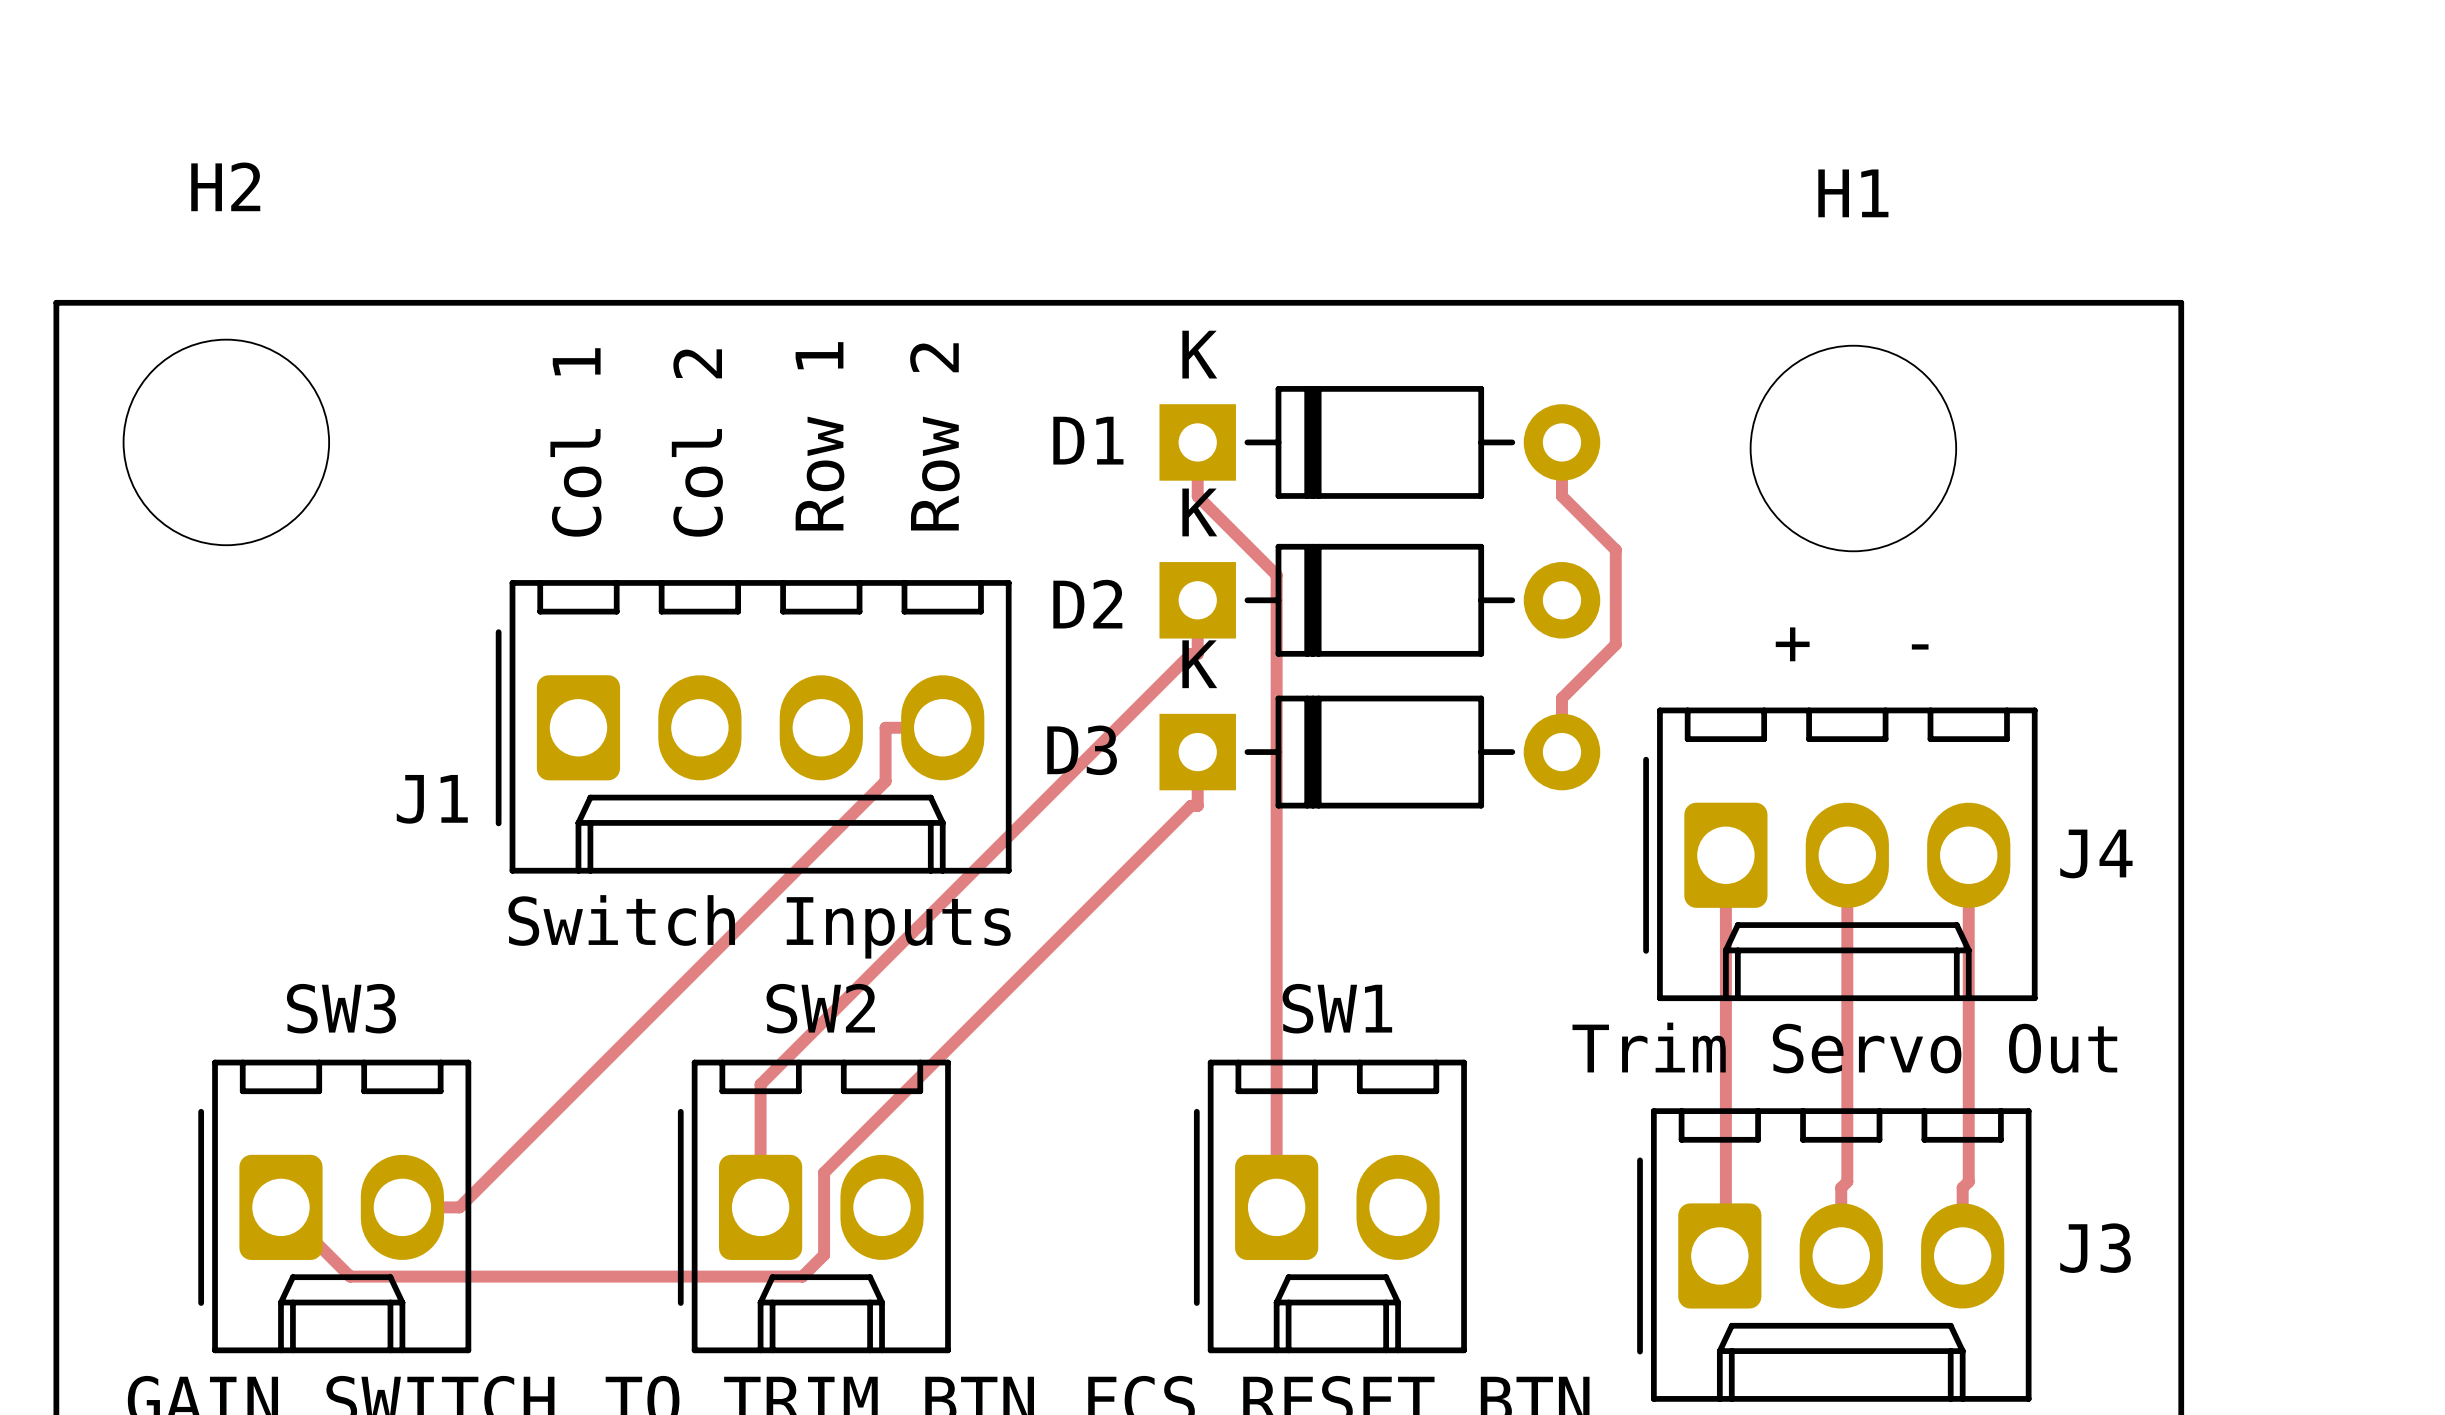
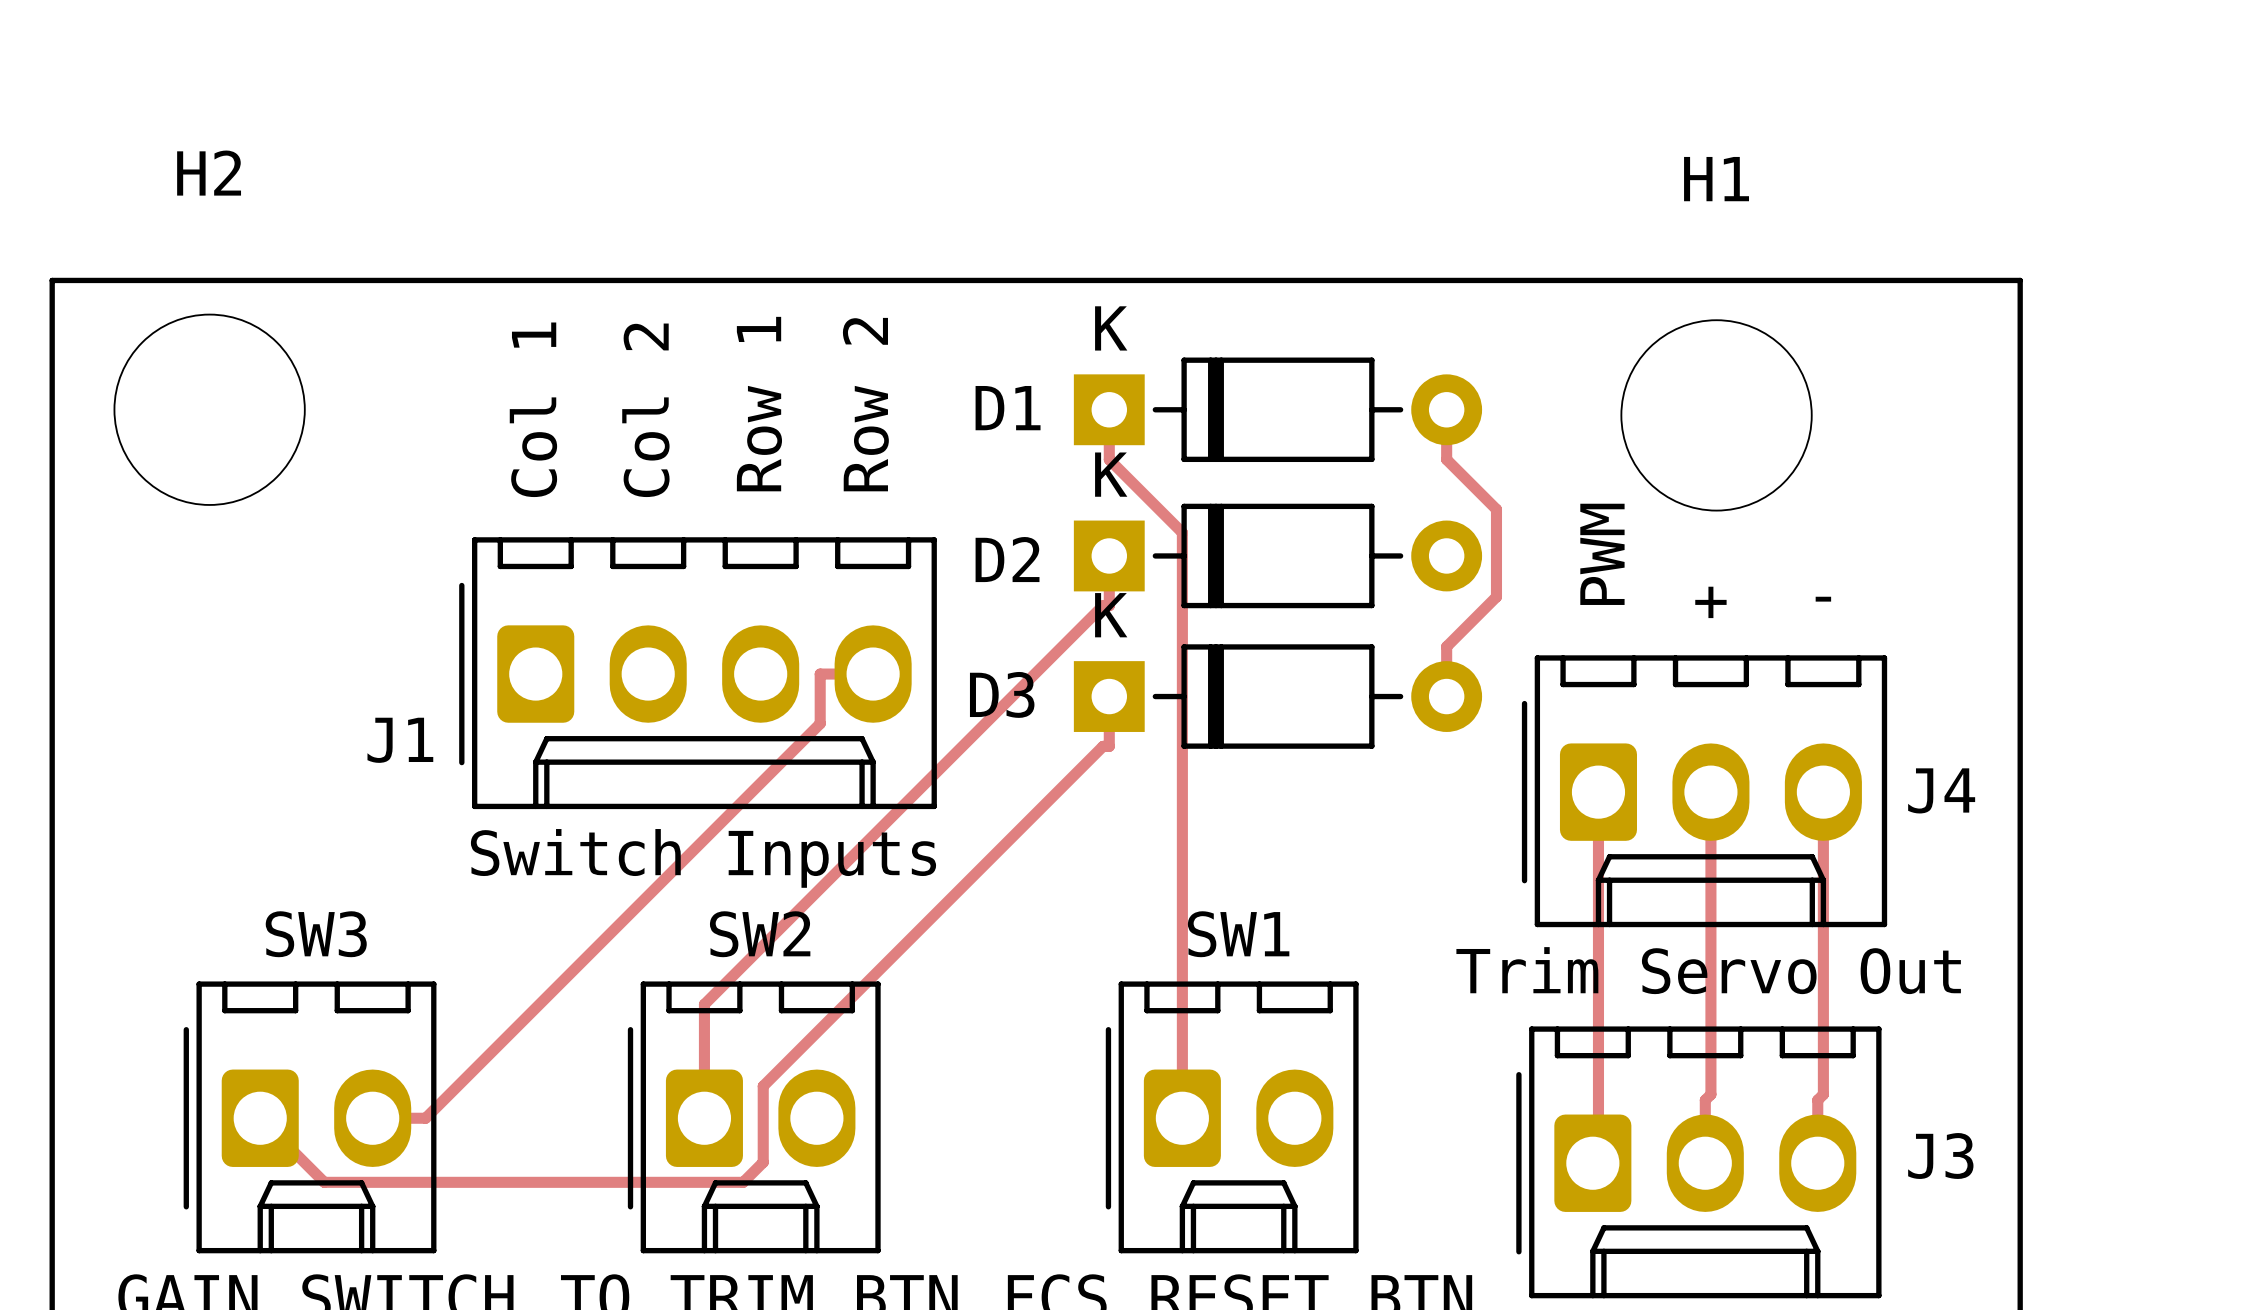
text: none -> PWM (1602, 554)
text position: + (1792, 644) -> + (1710, 602)
text position: - (1920, 646) -> - (1823, 599)

